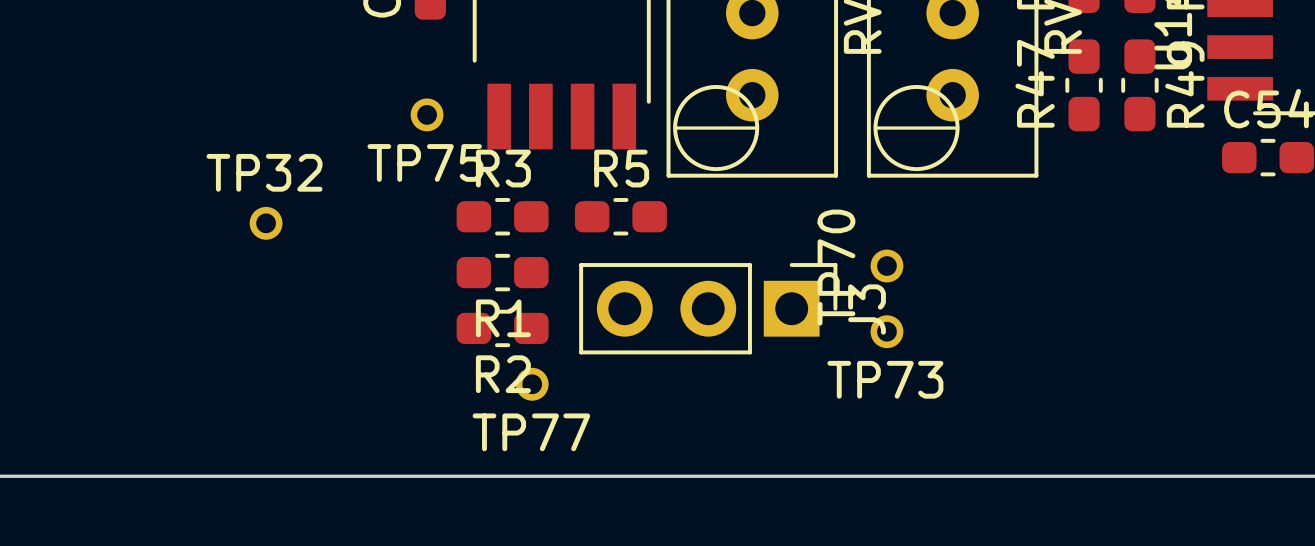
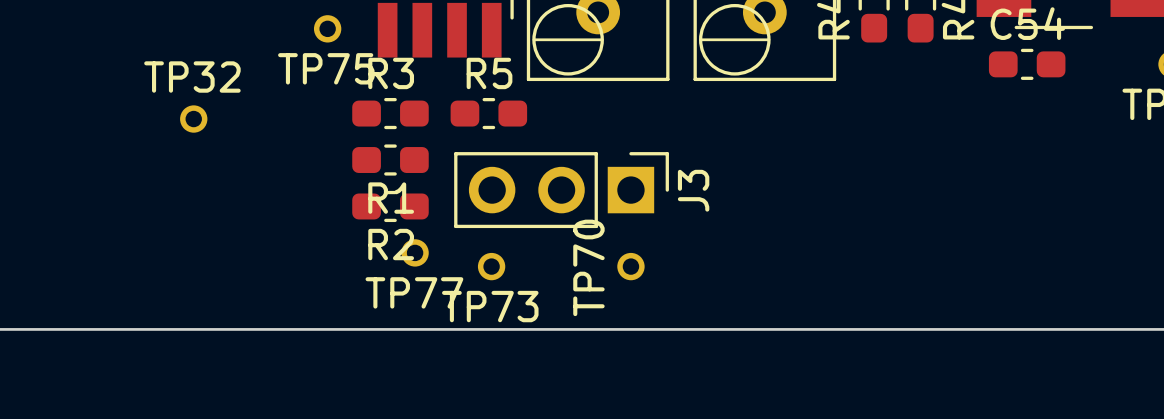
TP70 position: (886, 266) -> (630, 266)
TP73 position: (886, 331) -> (491, 266)

